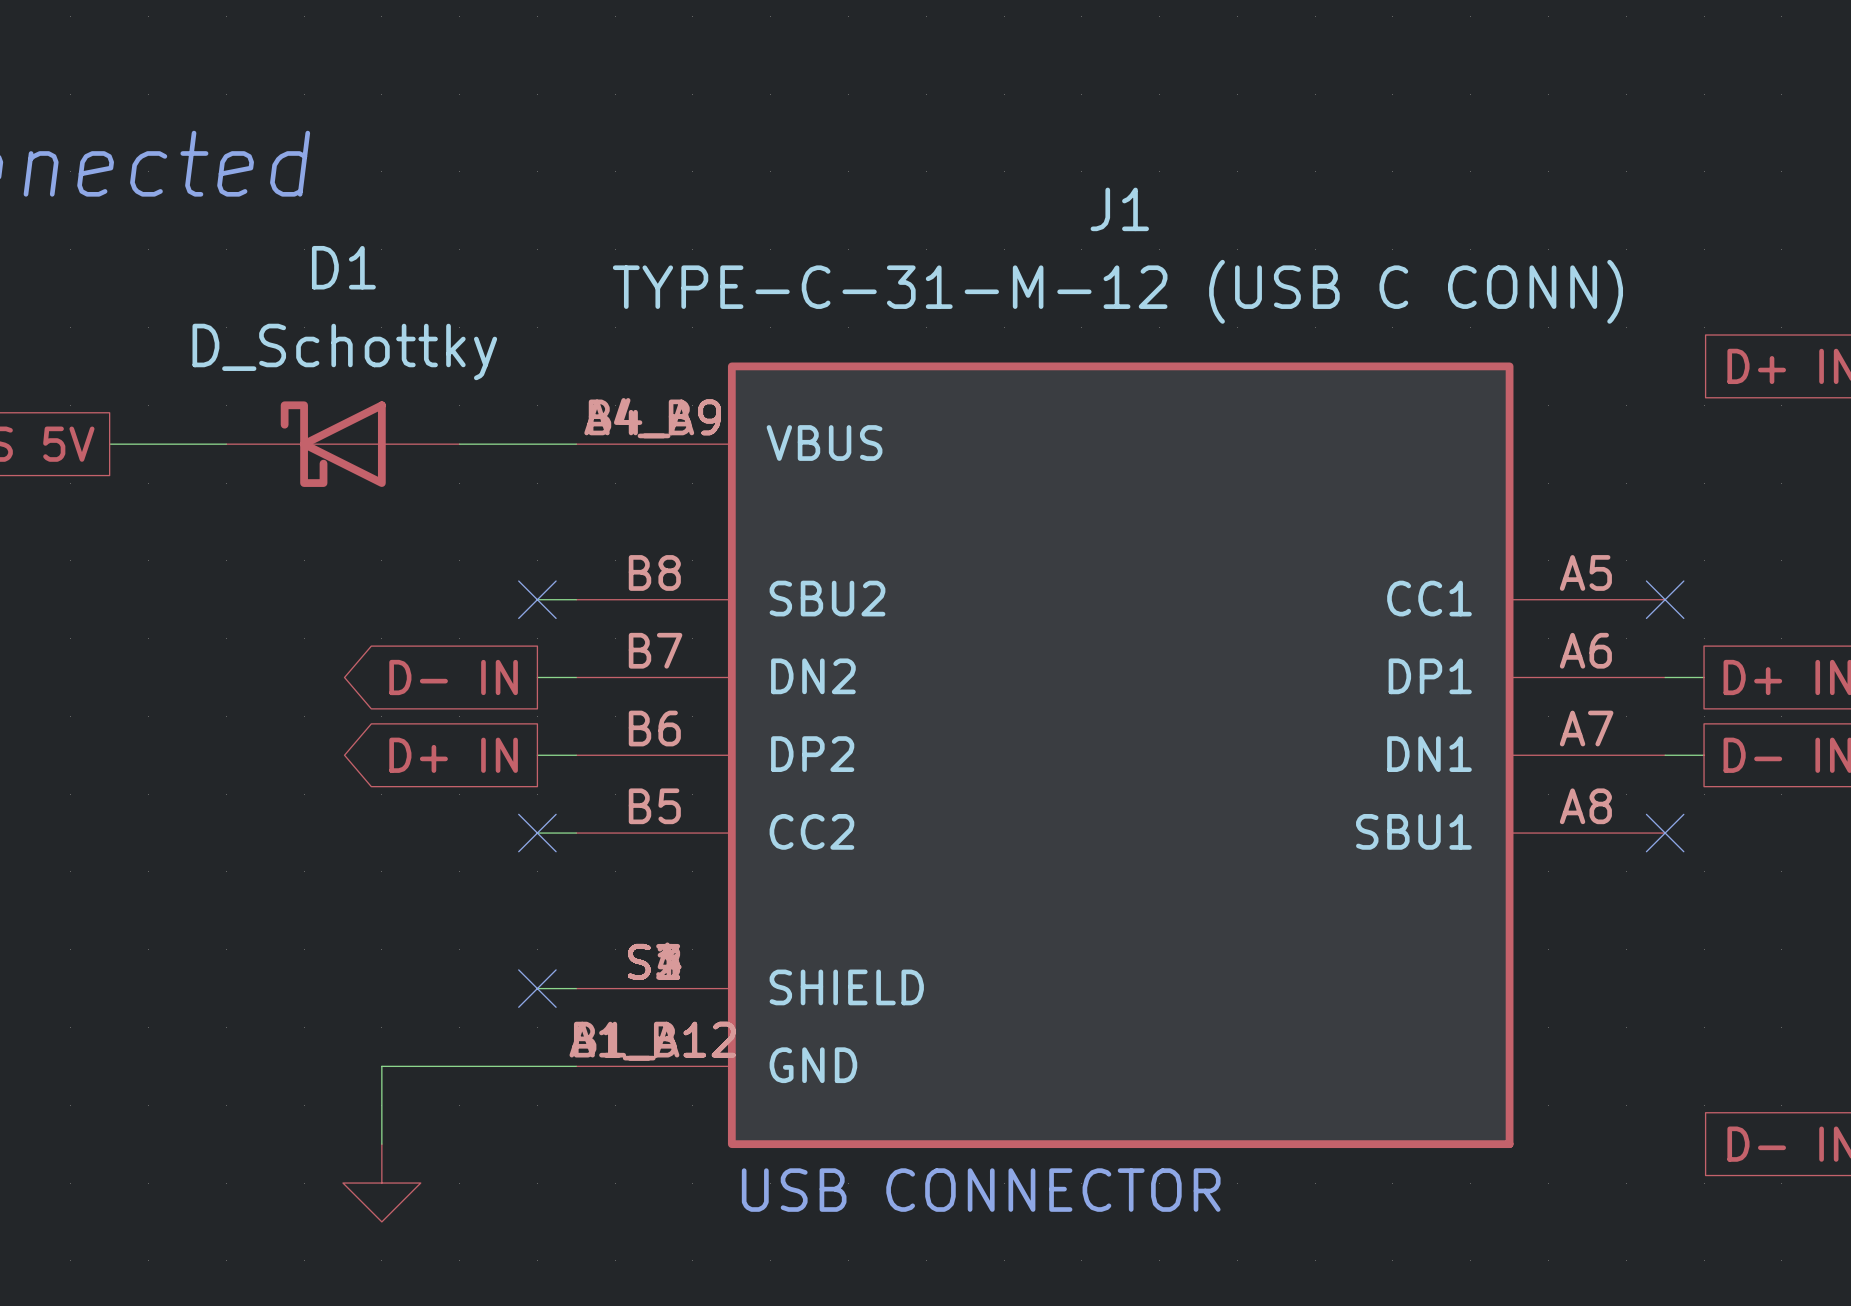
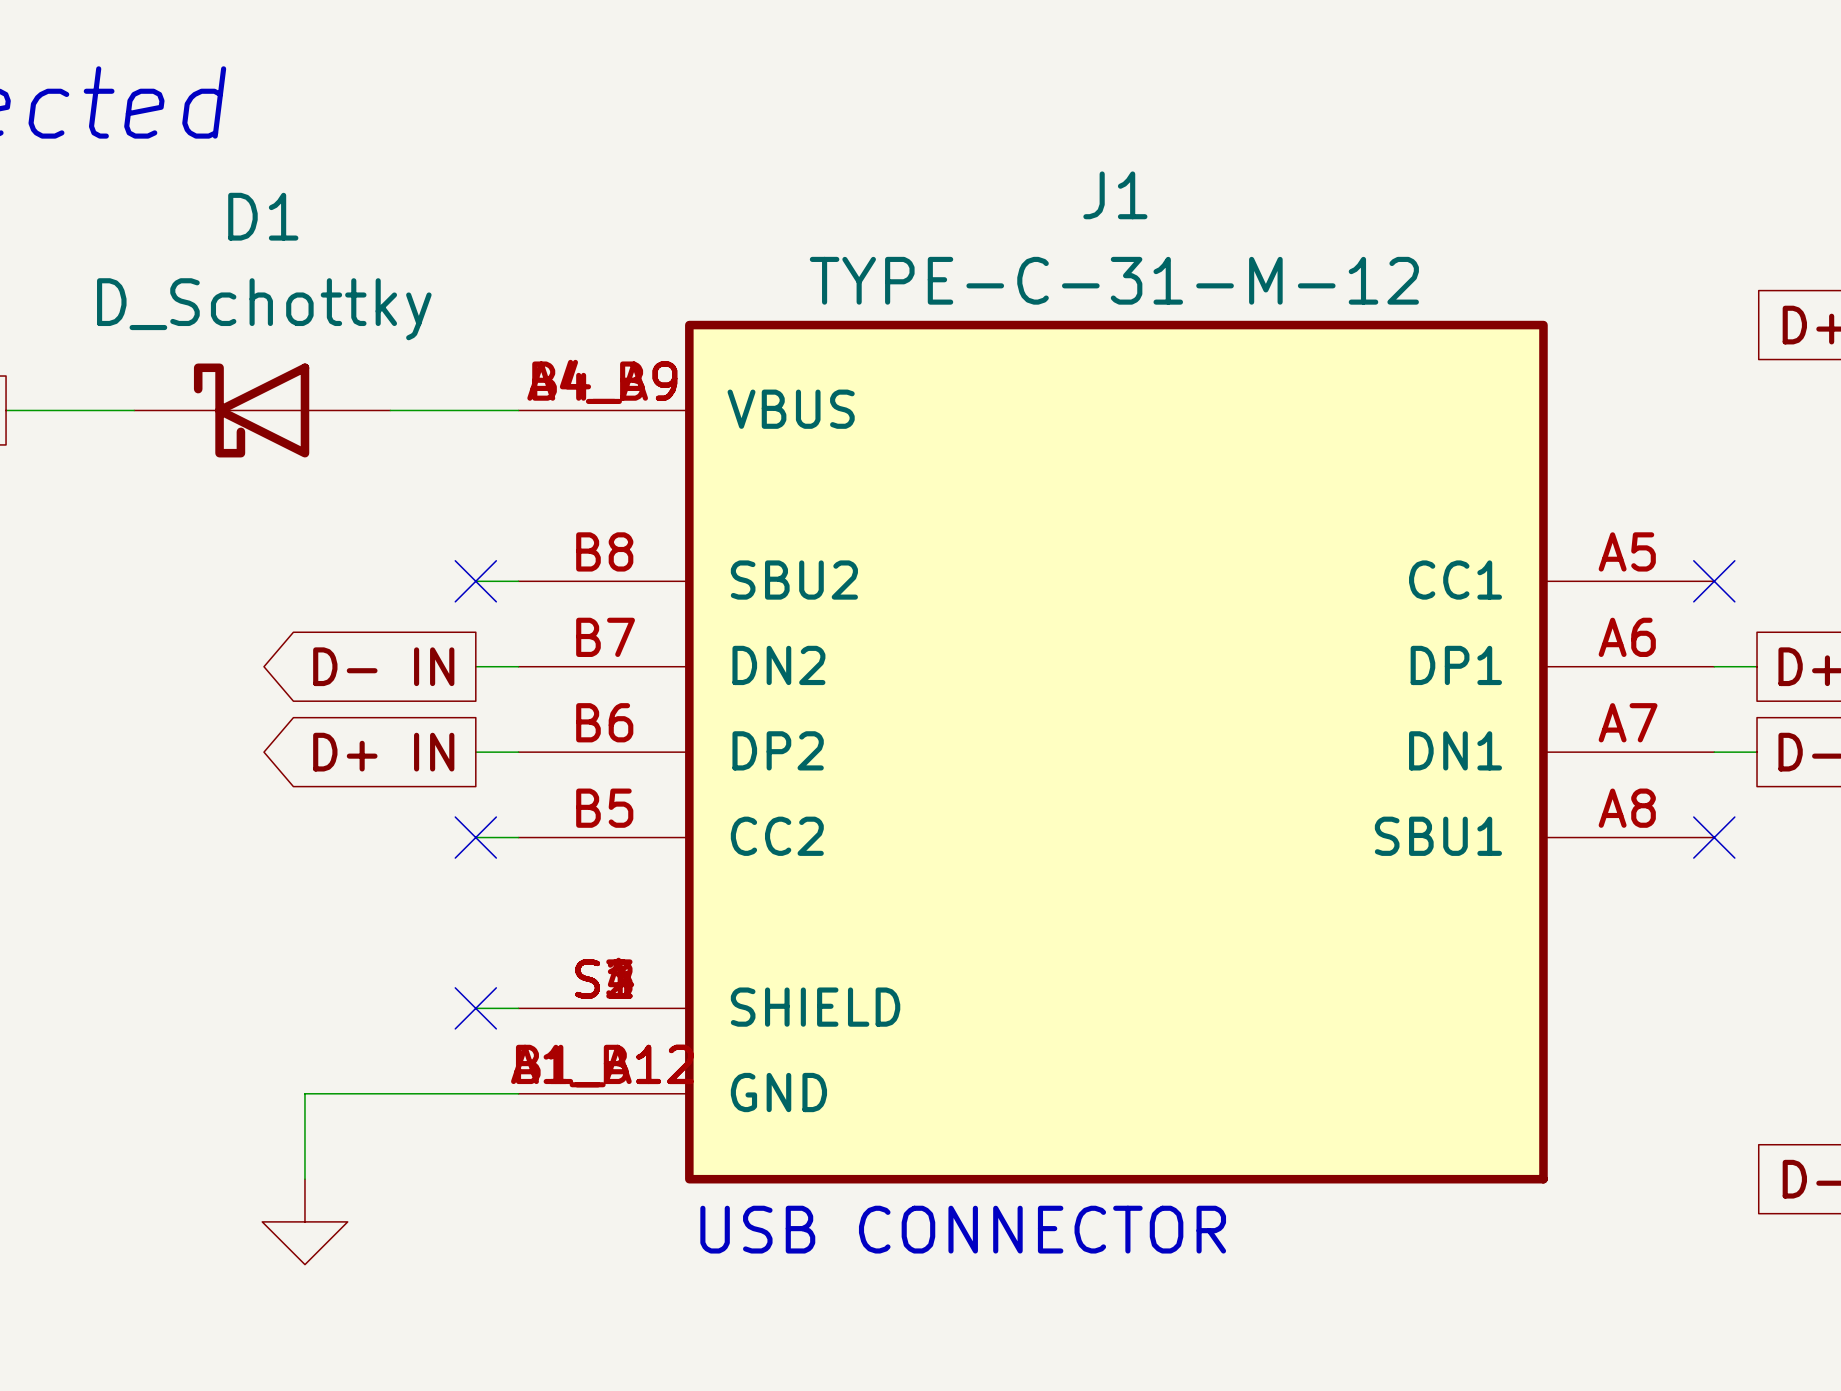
J1 name position: J1 (1119, 209) -> J1 (1115, 195)
J1 value: TYPE-C-31-M-12 (USB C CONN) (1117, 291) -> TYPE-C-31-M-12 (1114, 280)

